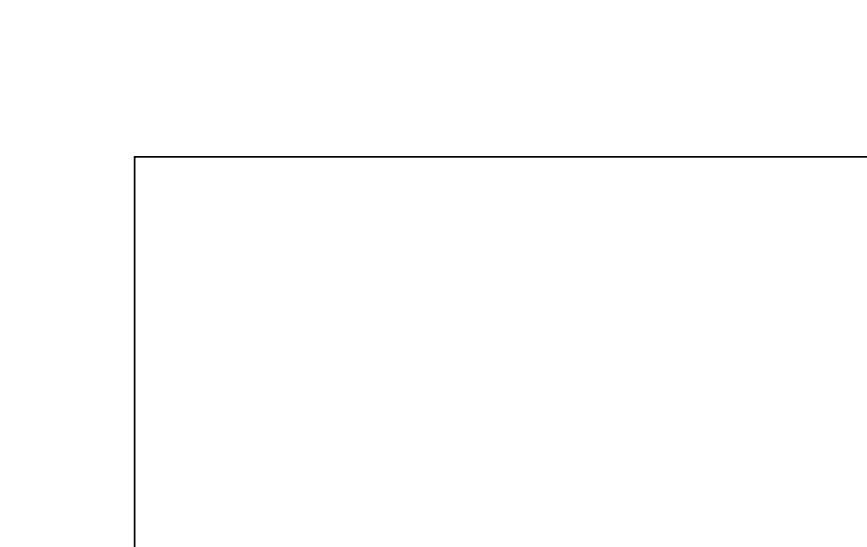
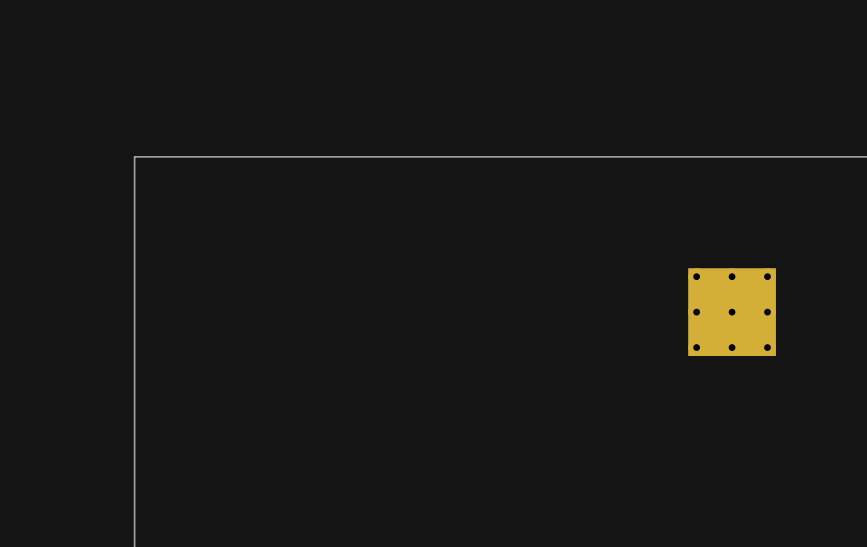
part: none -> (732, 312)

